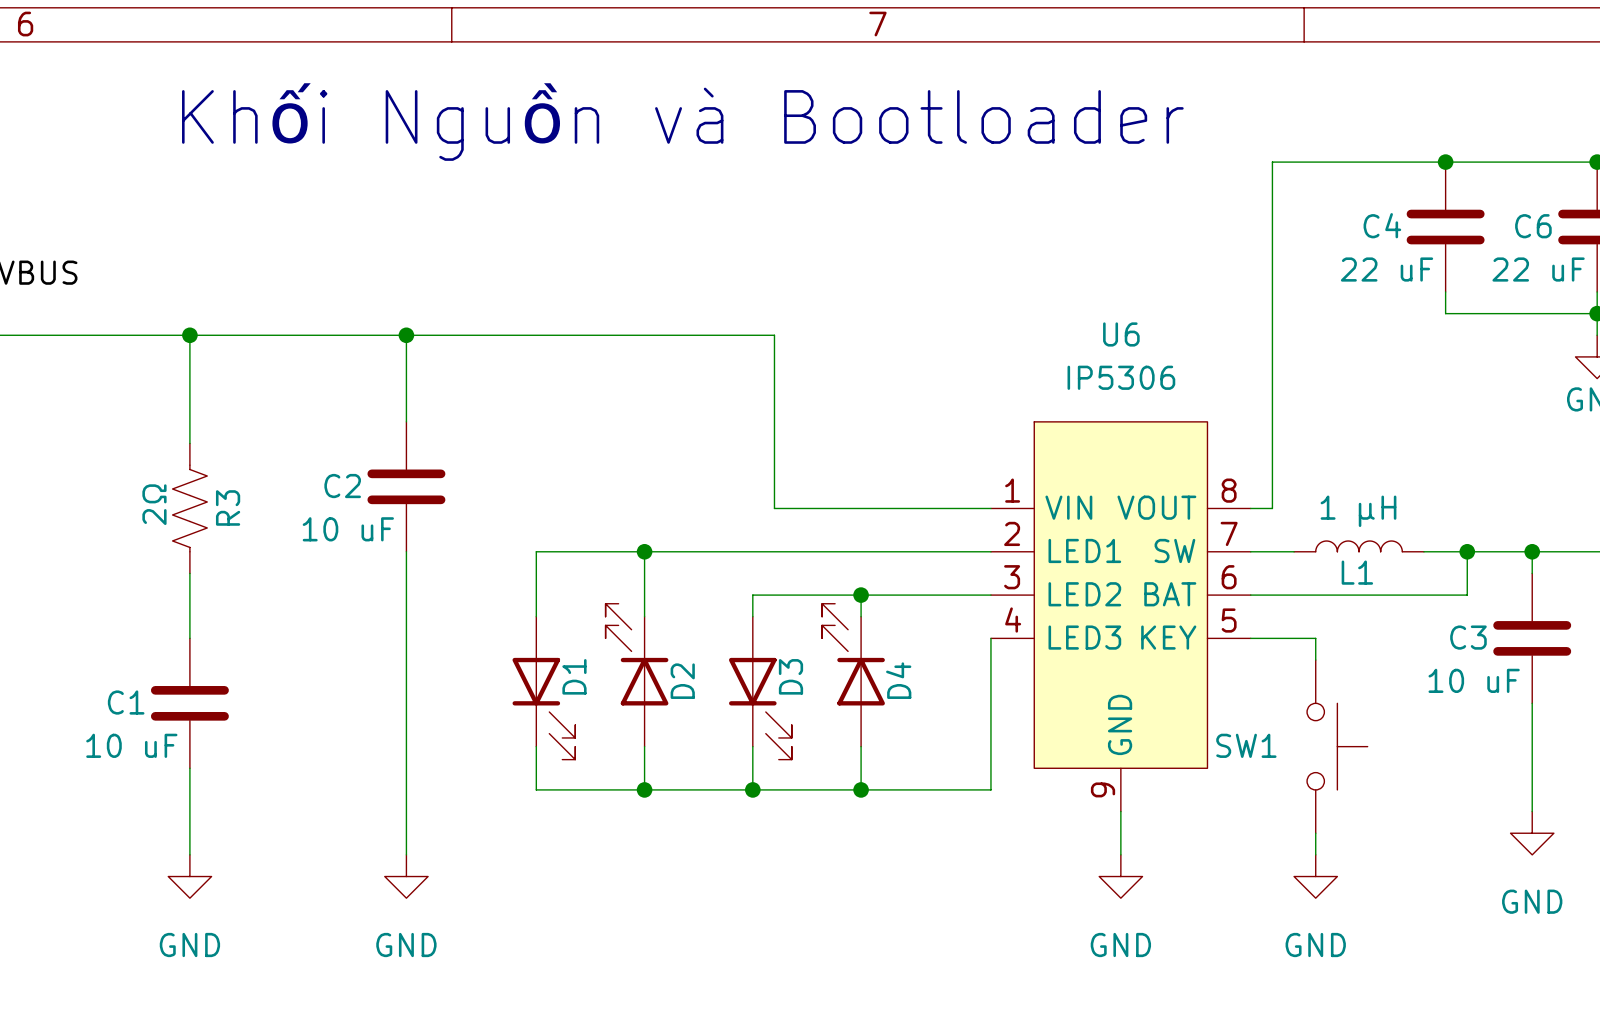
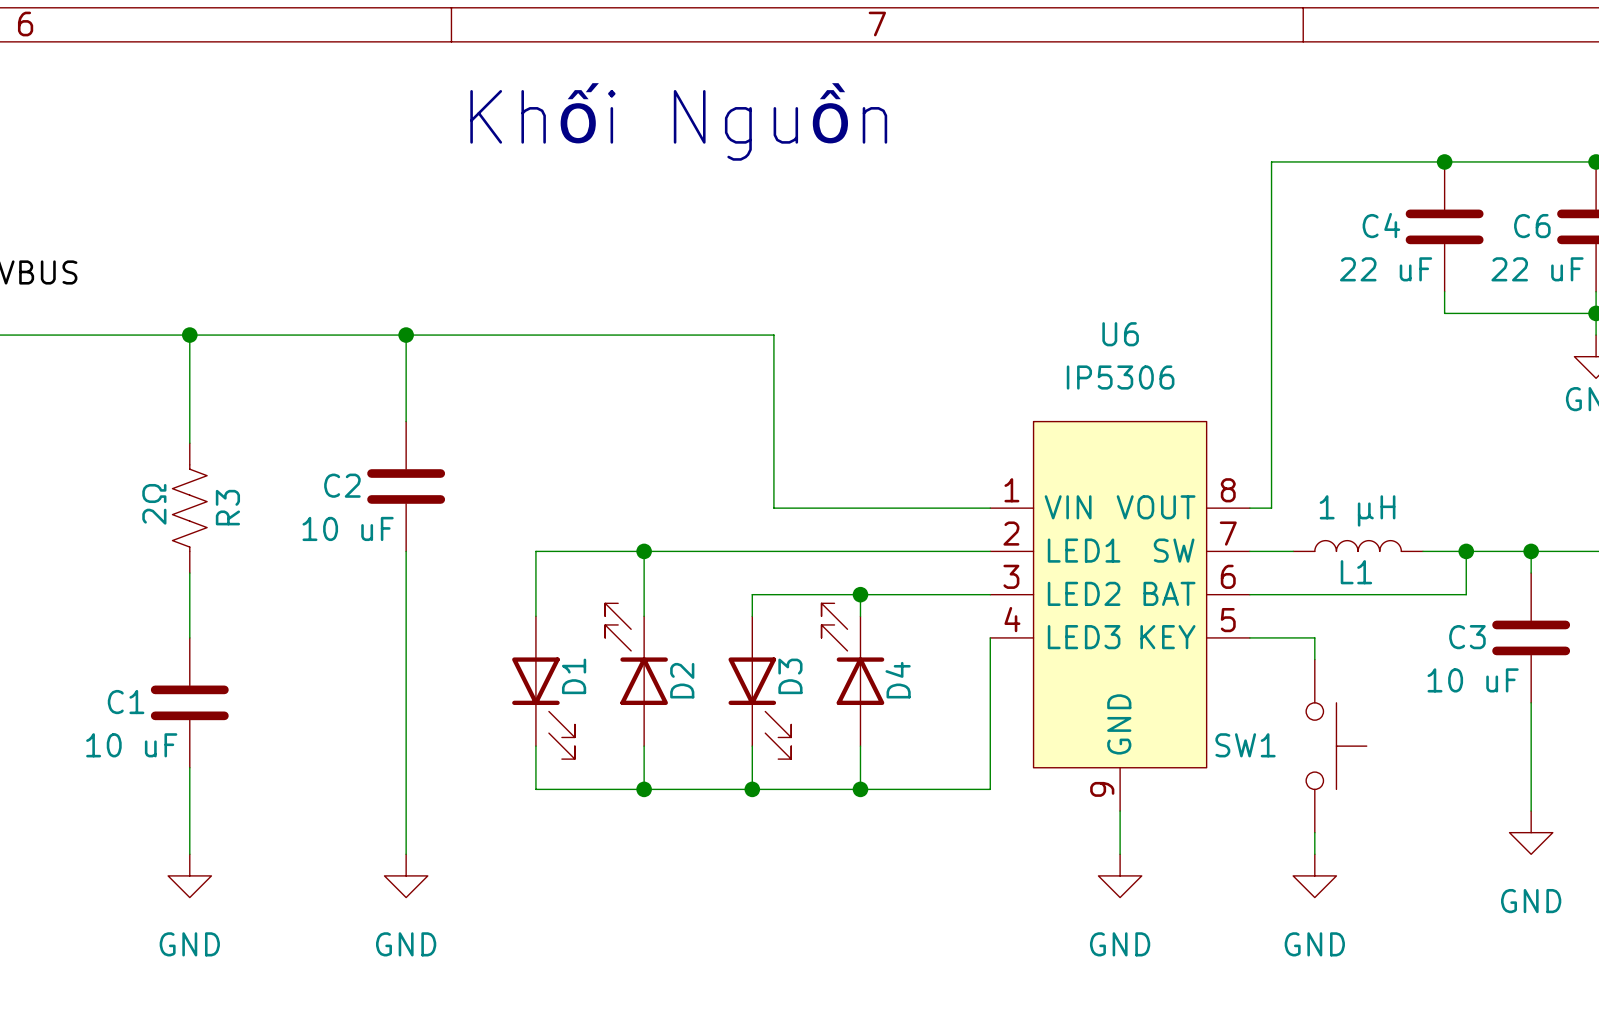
text: Khối Nguồn và Bootloader (682, 121) -> Khối Nguồn (678, 121)

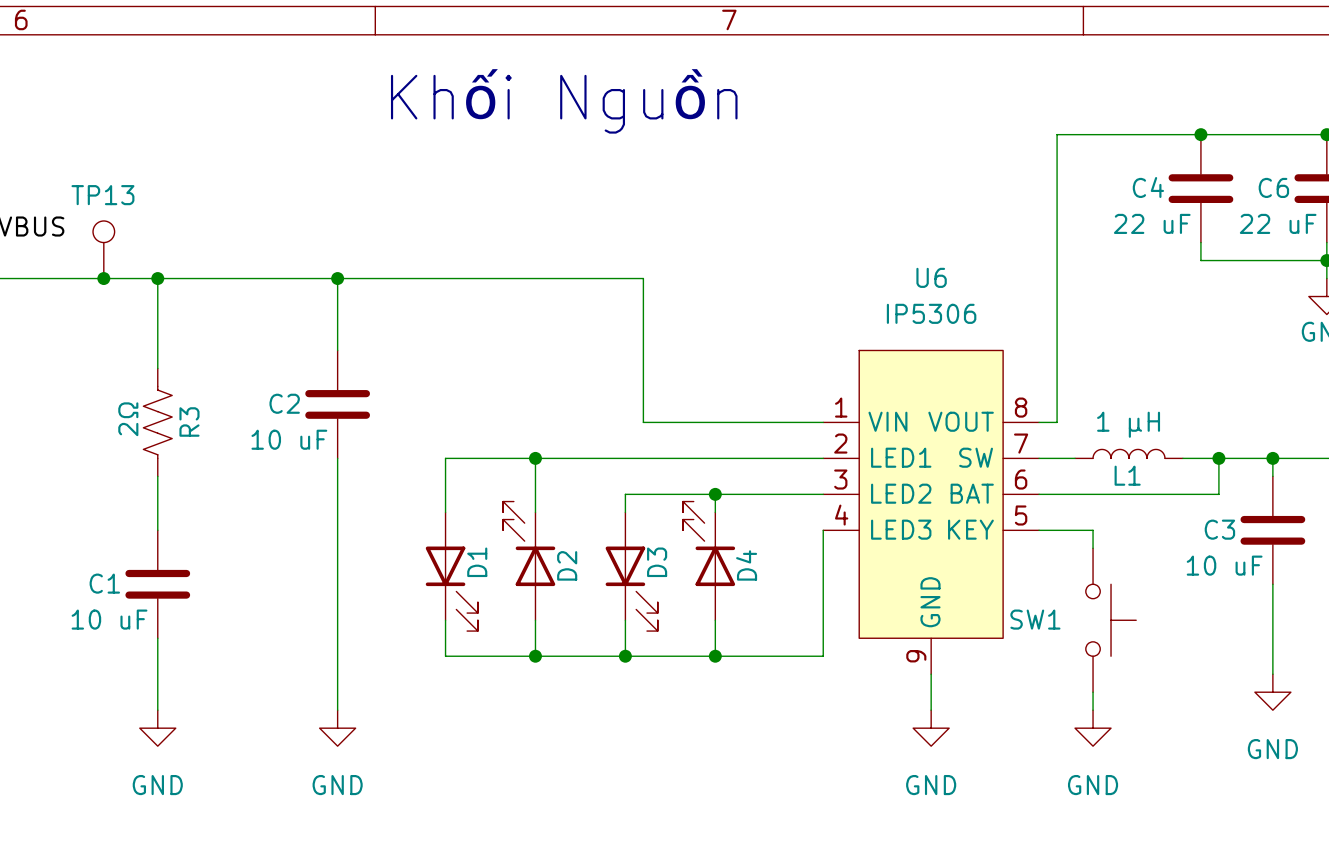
TP13: none -> (103, 249)
junction: none -> (103, 278)

